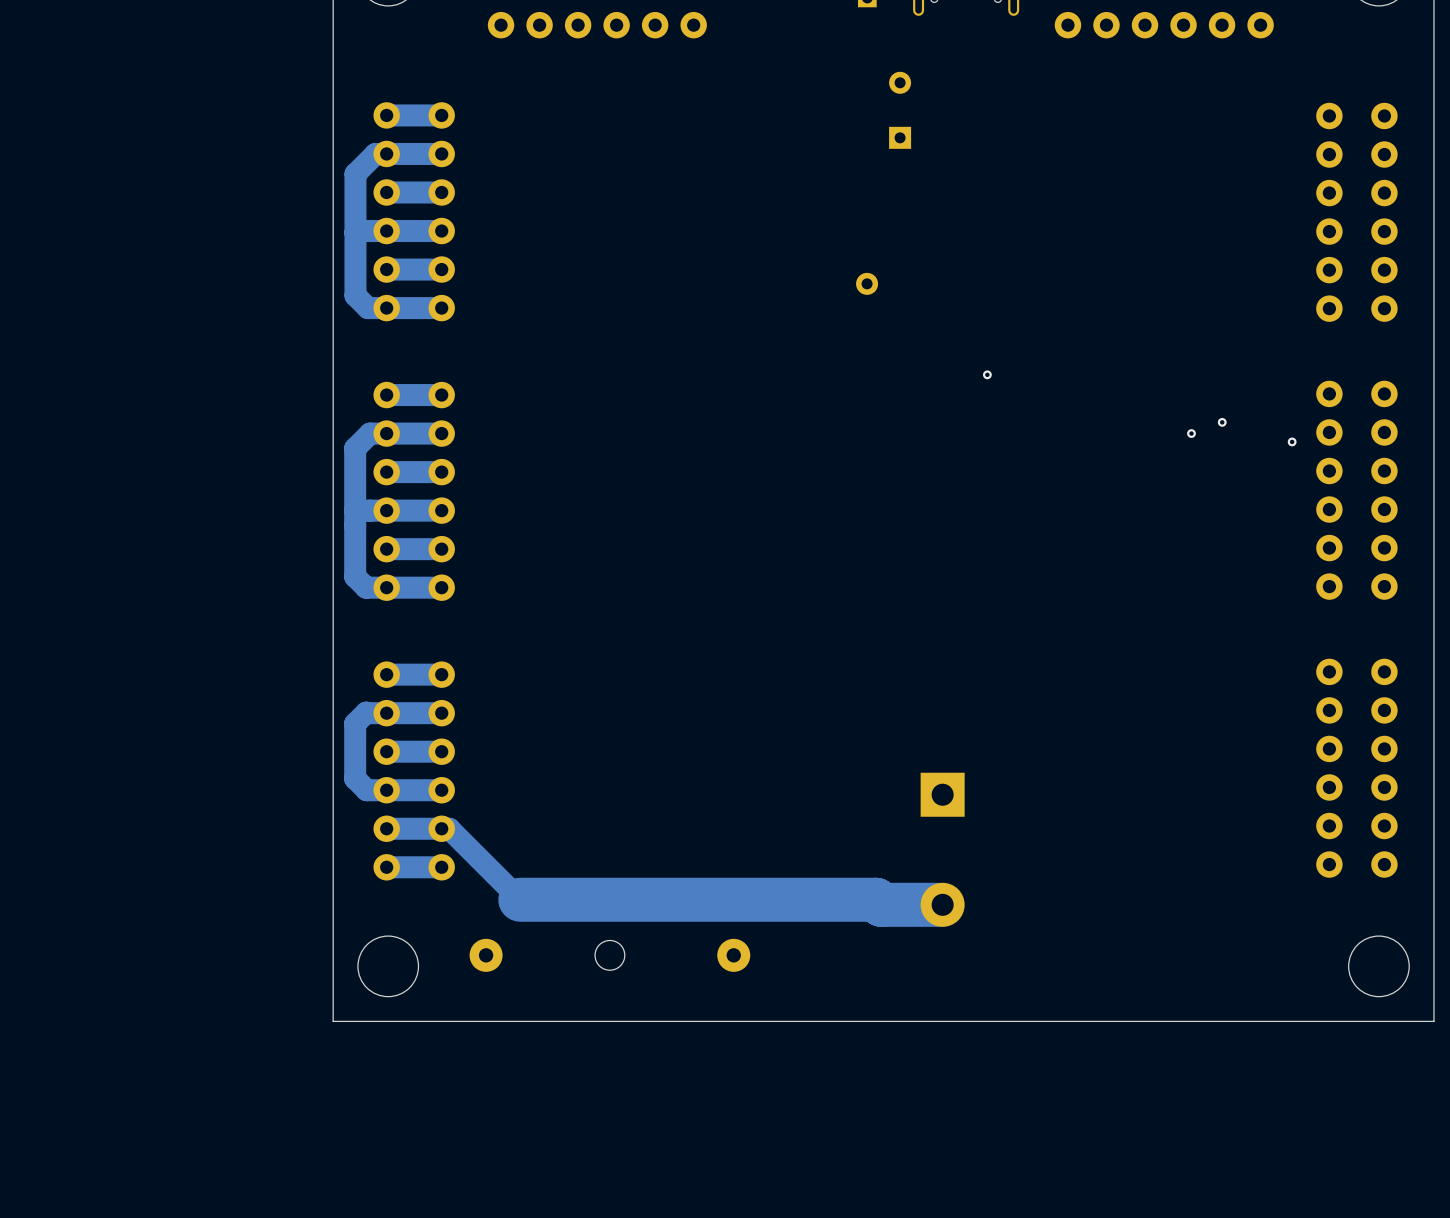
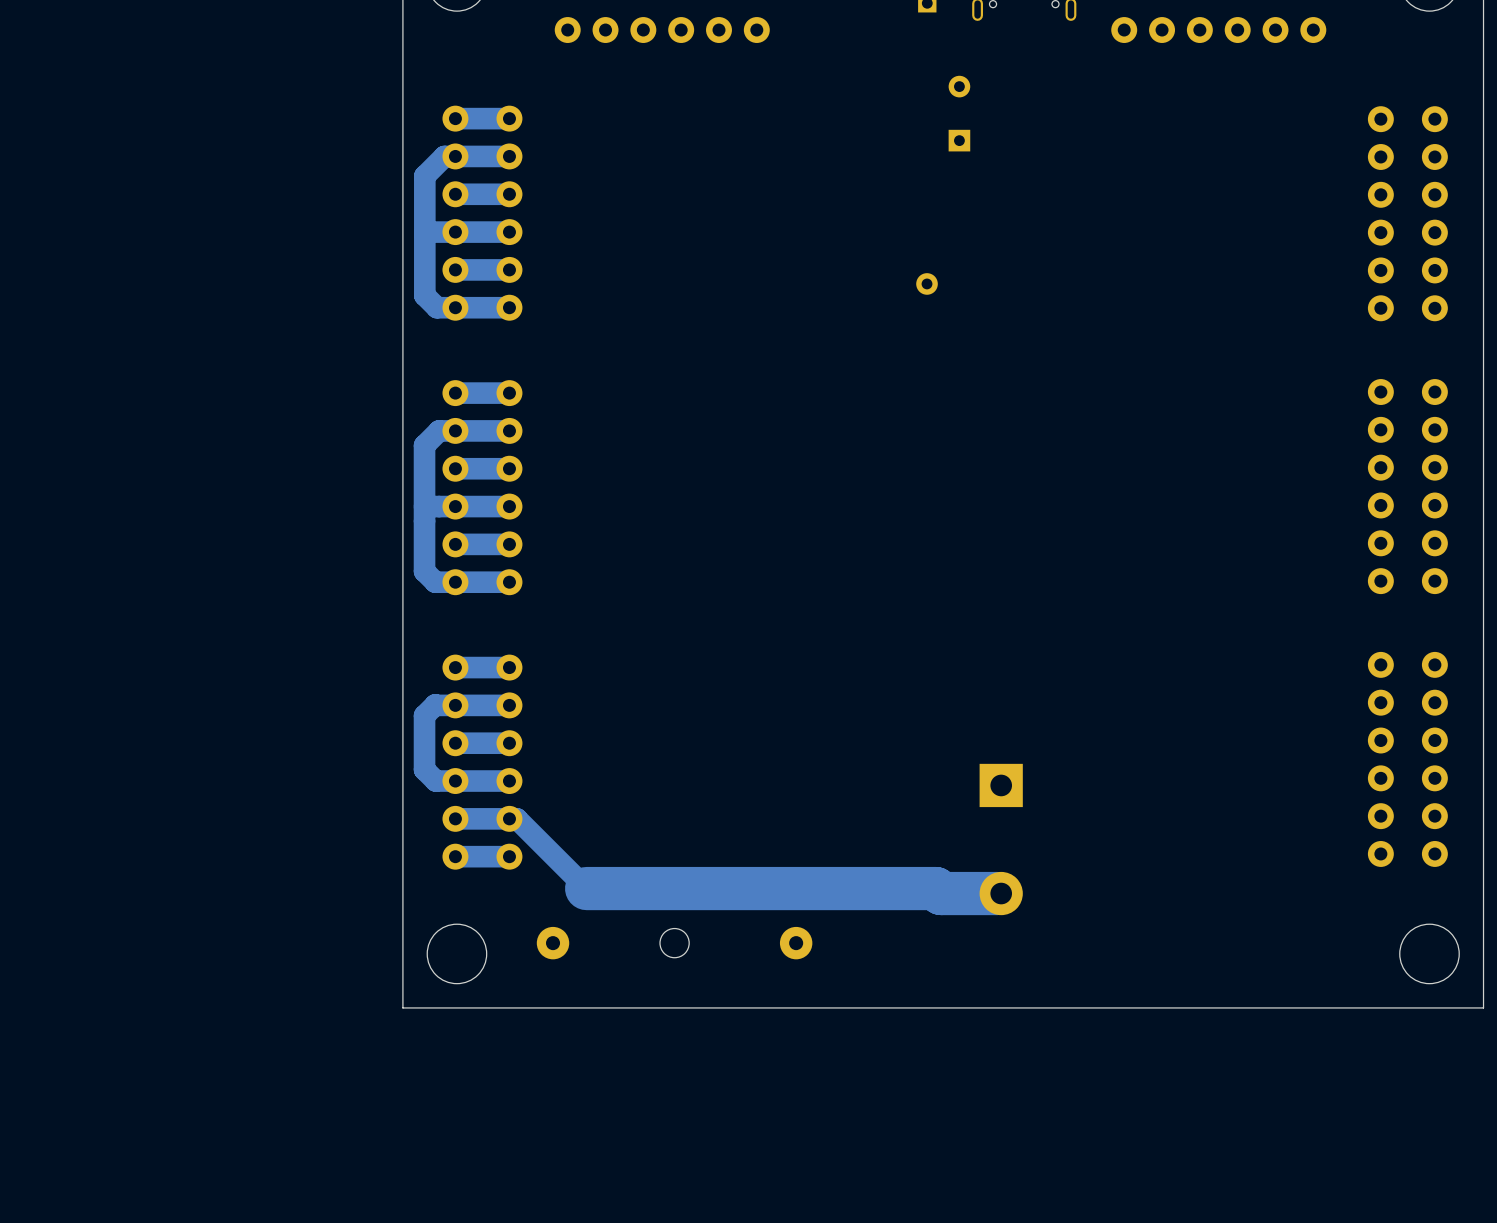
via: (987, 374) -> none
via: (1222, 422) -> none
via: (1191, 433) -> none
via: (1292, 441) -> none

